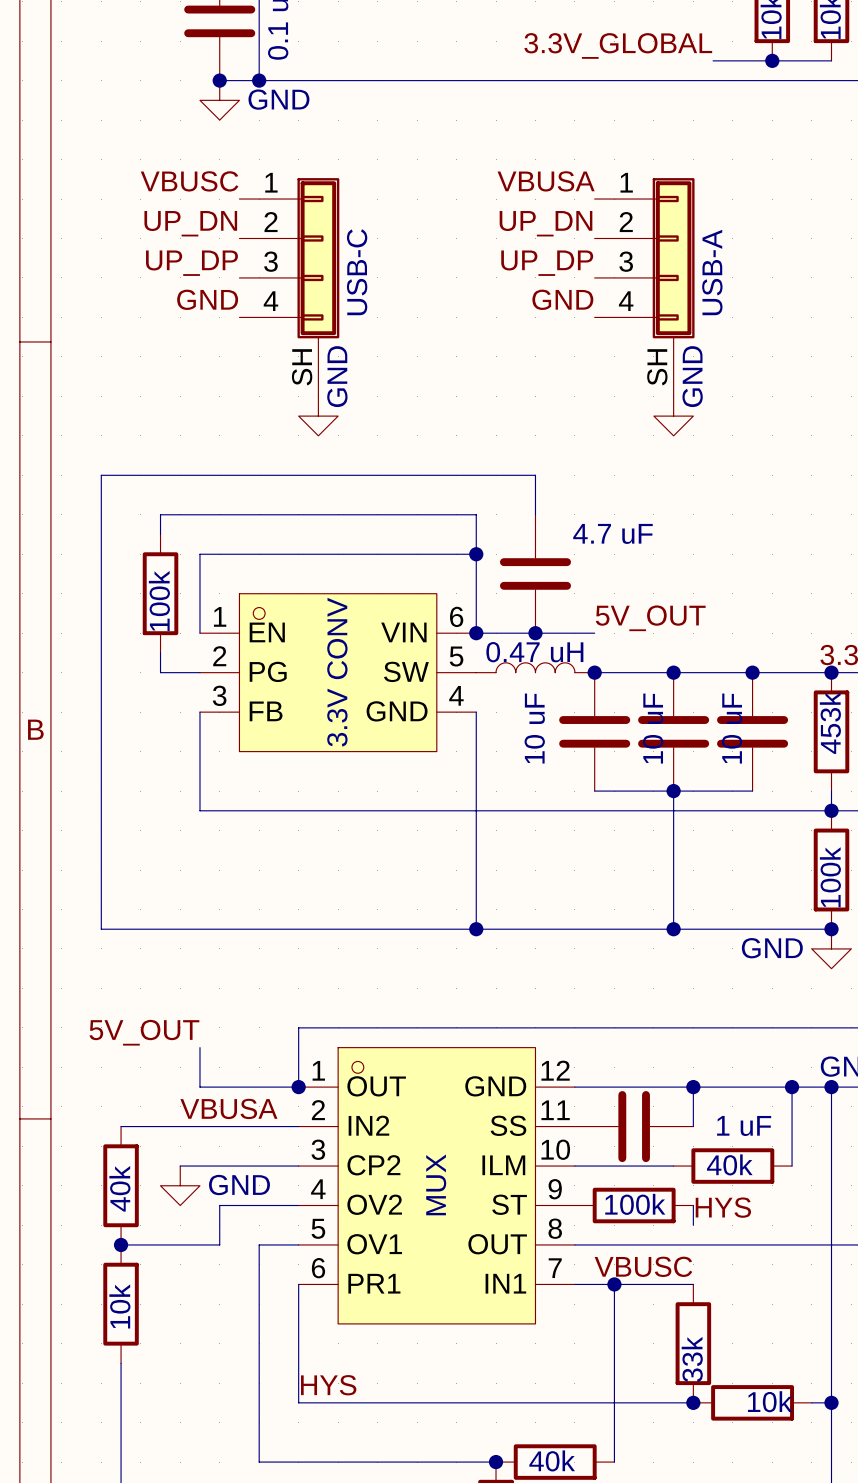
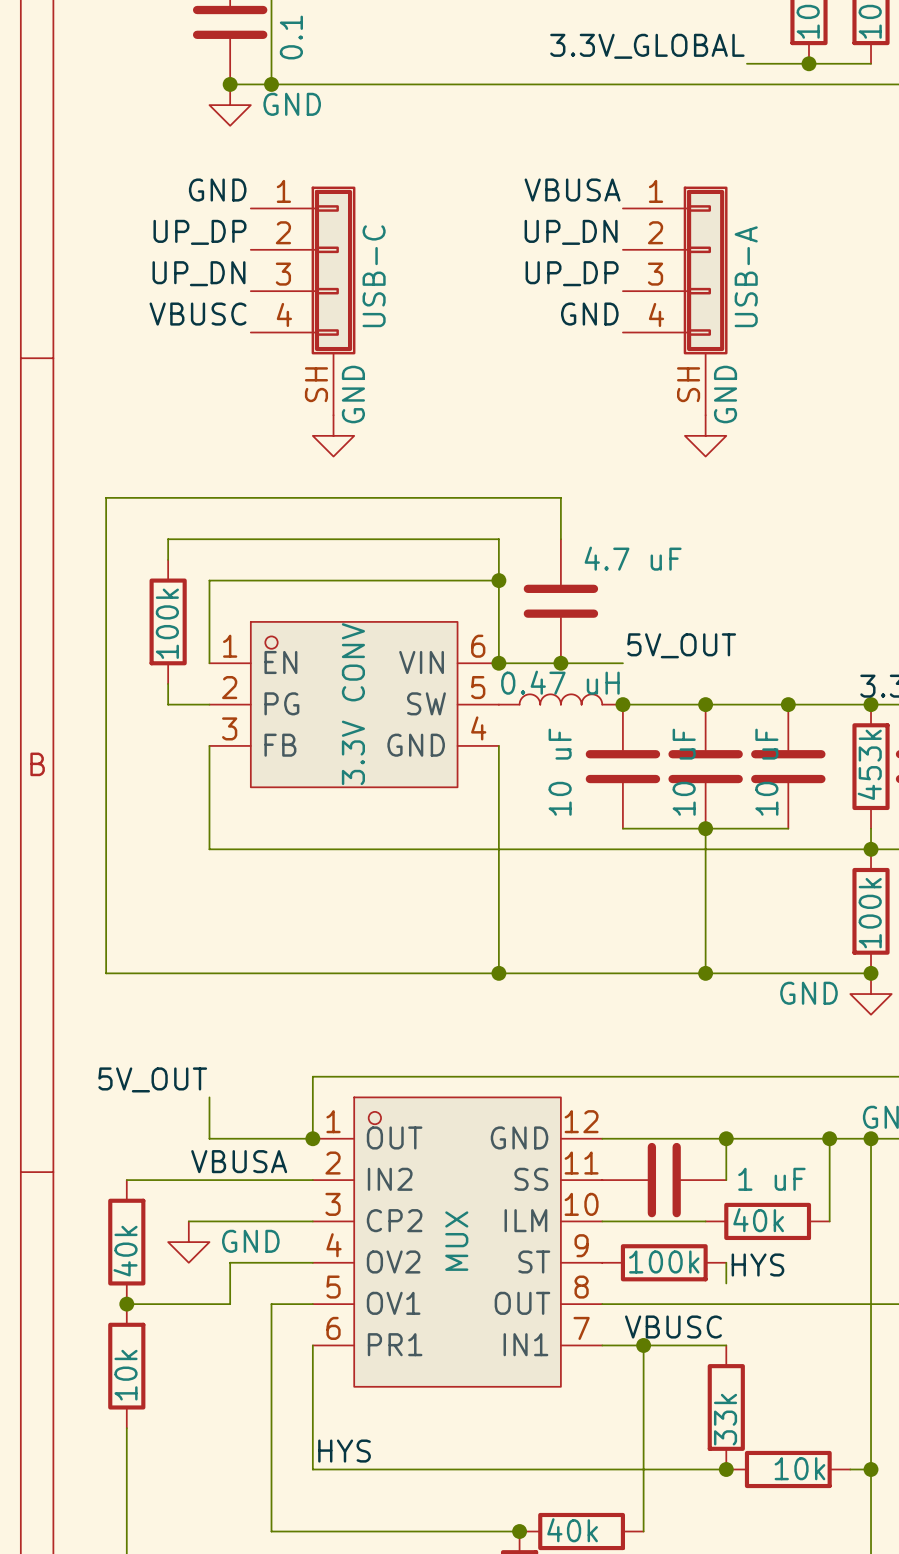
label: VBUSC (189, 181) -> GND (217, 190)
label: UP_DN (190, 223) -> UP_DP (199, 232)
label: UP_DP (191, 263) -> UP_DN (198, 273)
label: GND (207, 299) -> VBUSC (198, 314)

